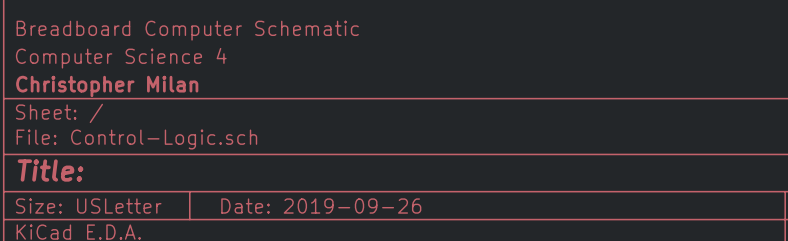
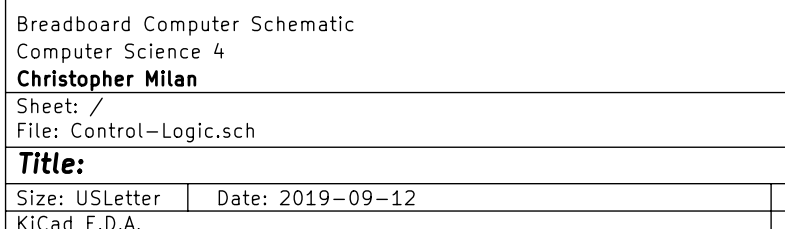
title block: Date: 2019-09-26 (321, 206) -> Date: 2019-09-12 (316, 197)

